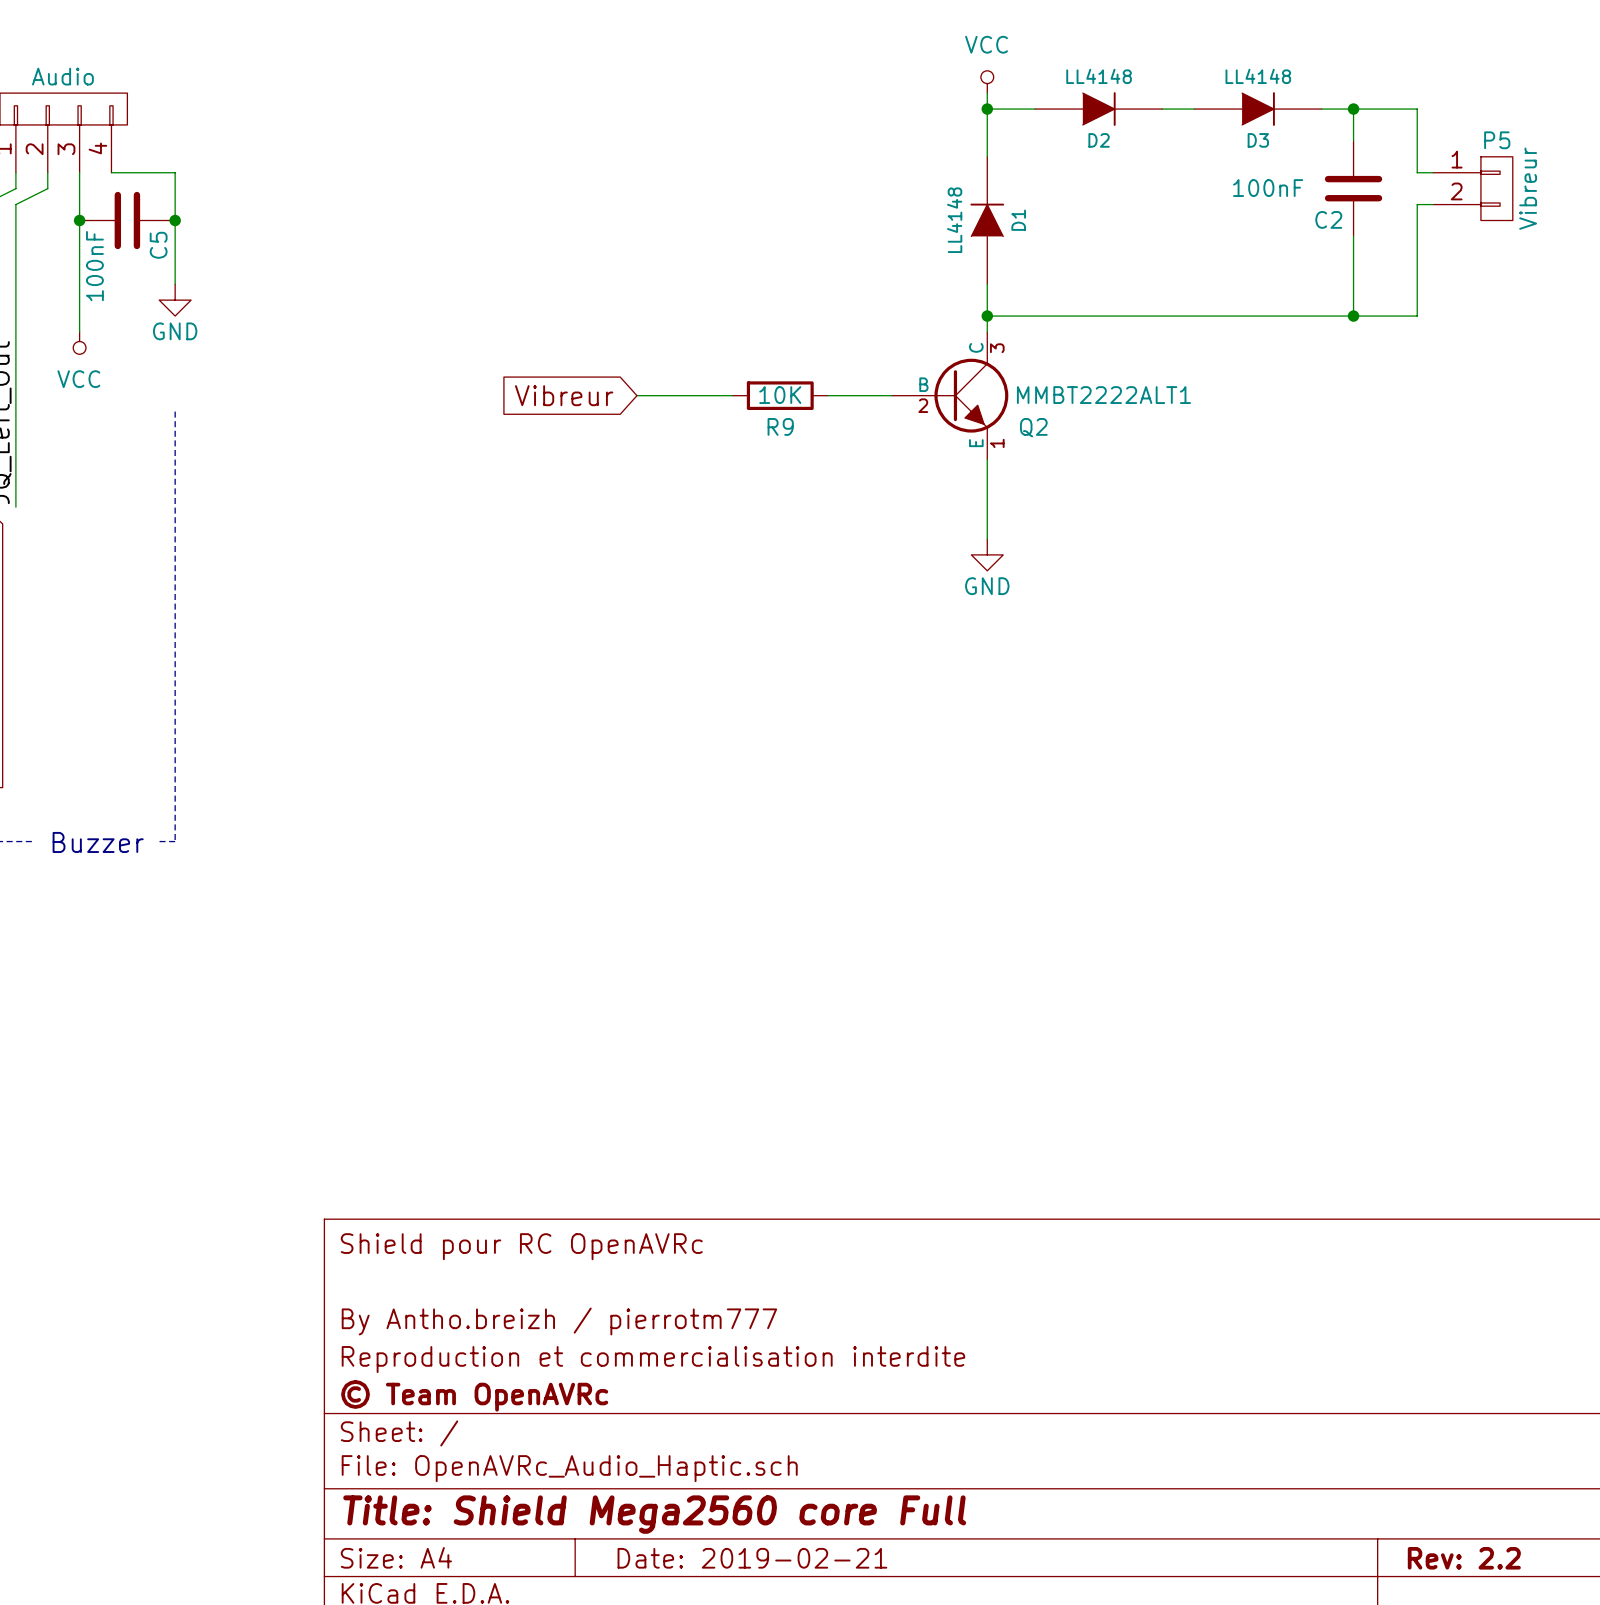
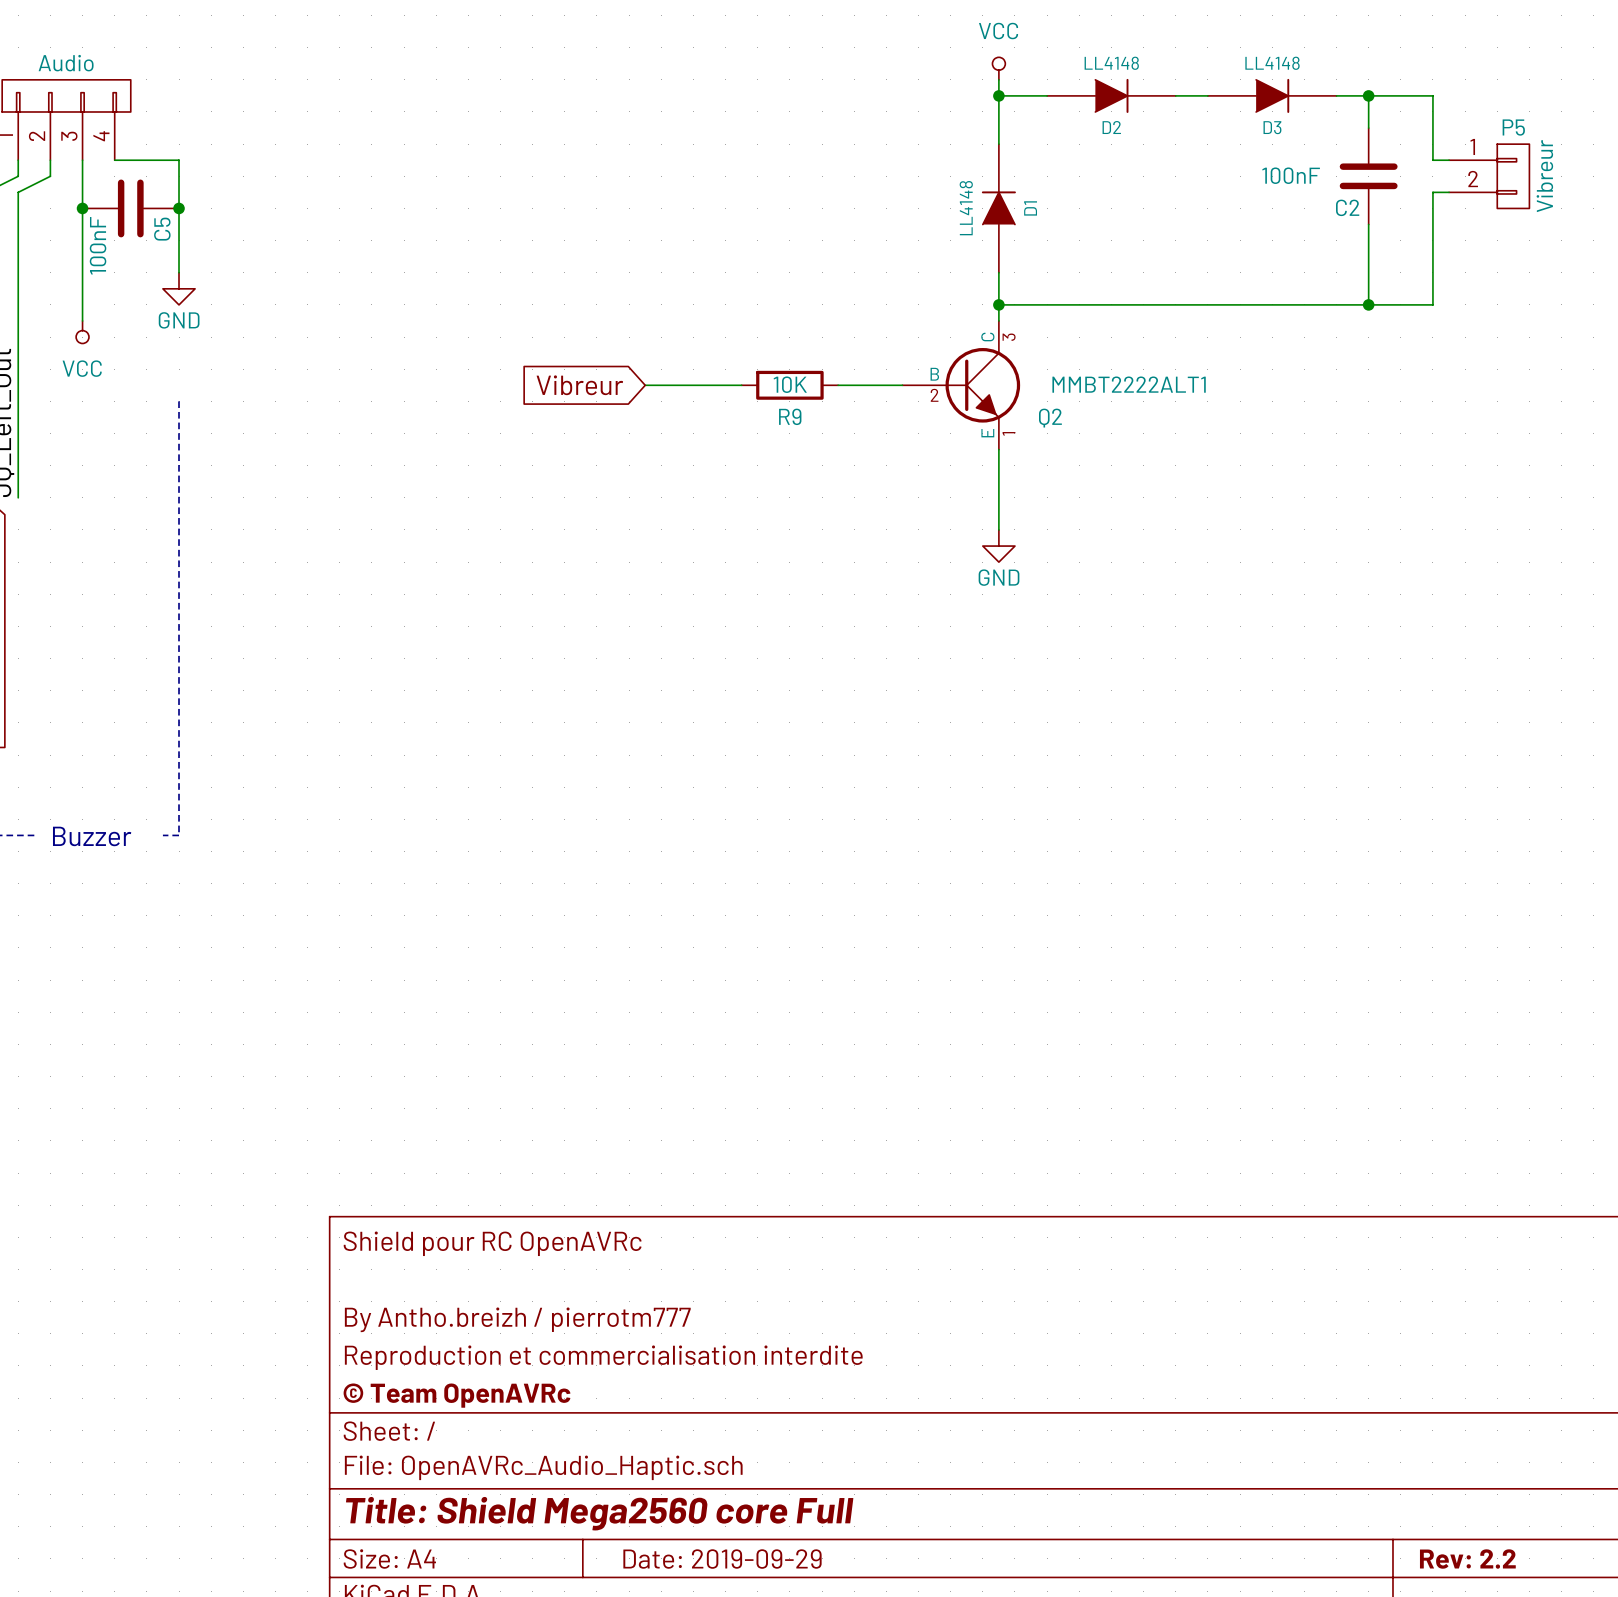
title block: Date: 2019-02-21 (752, 1558) -> Date: 2019-09-29 (722, 1559)

